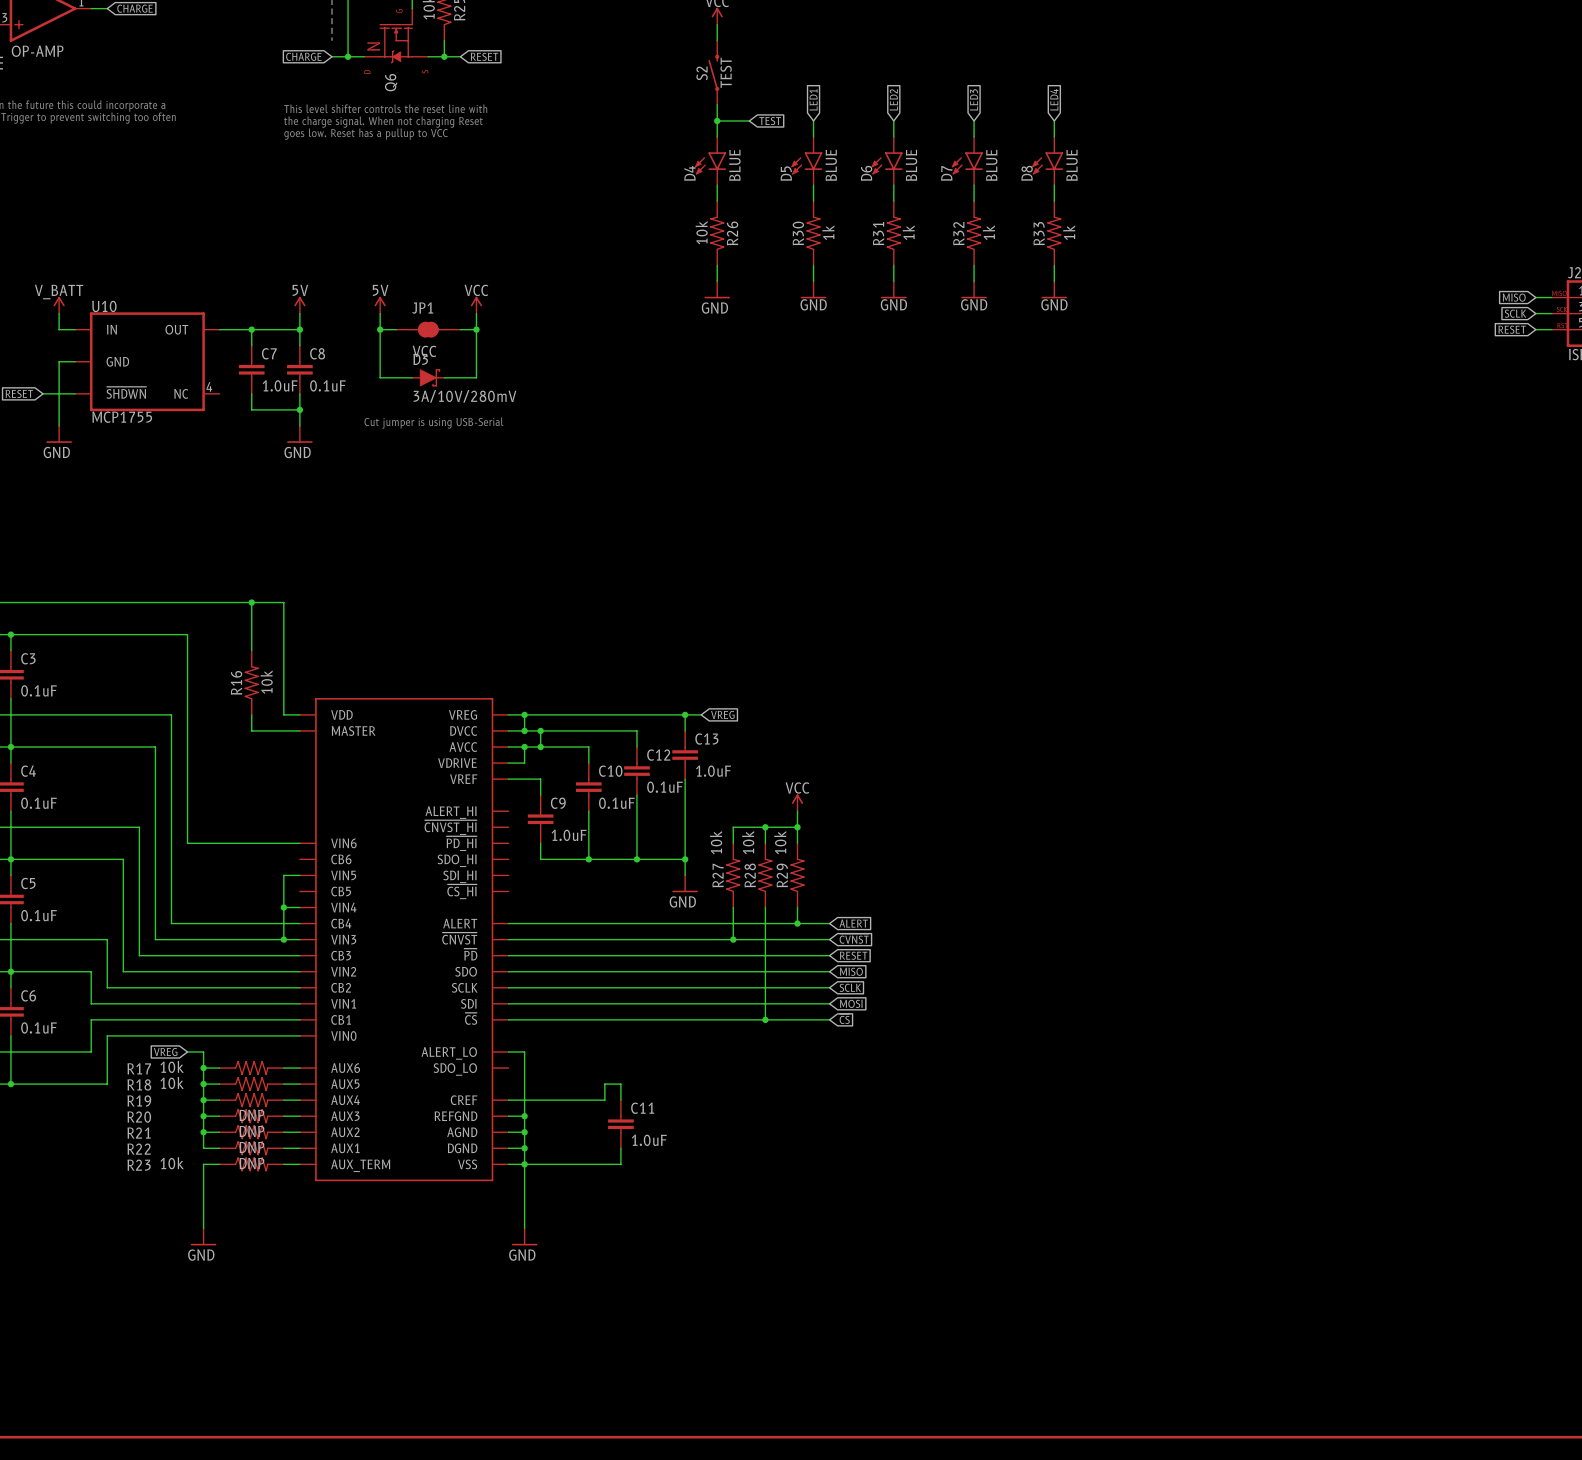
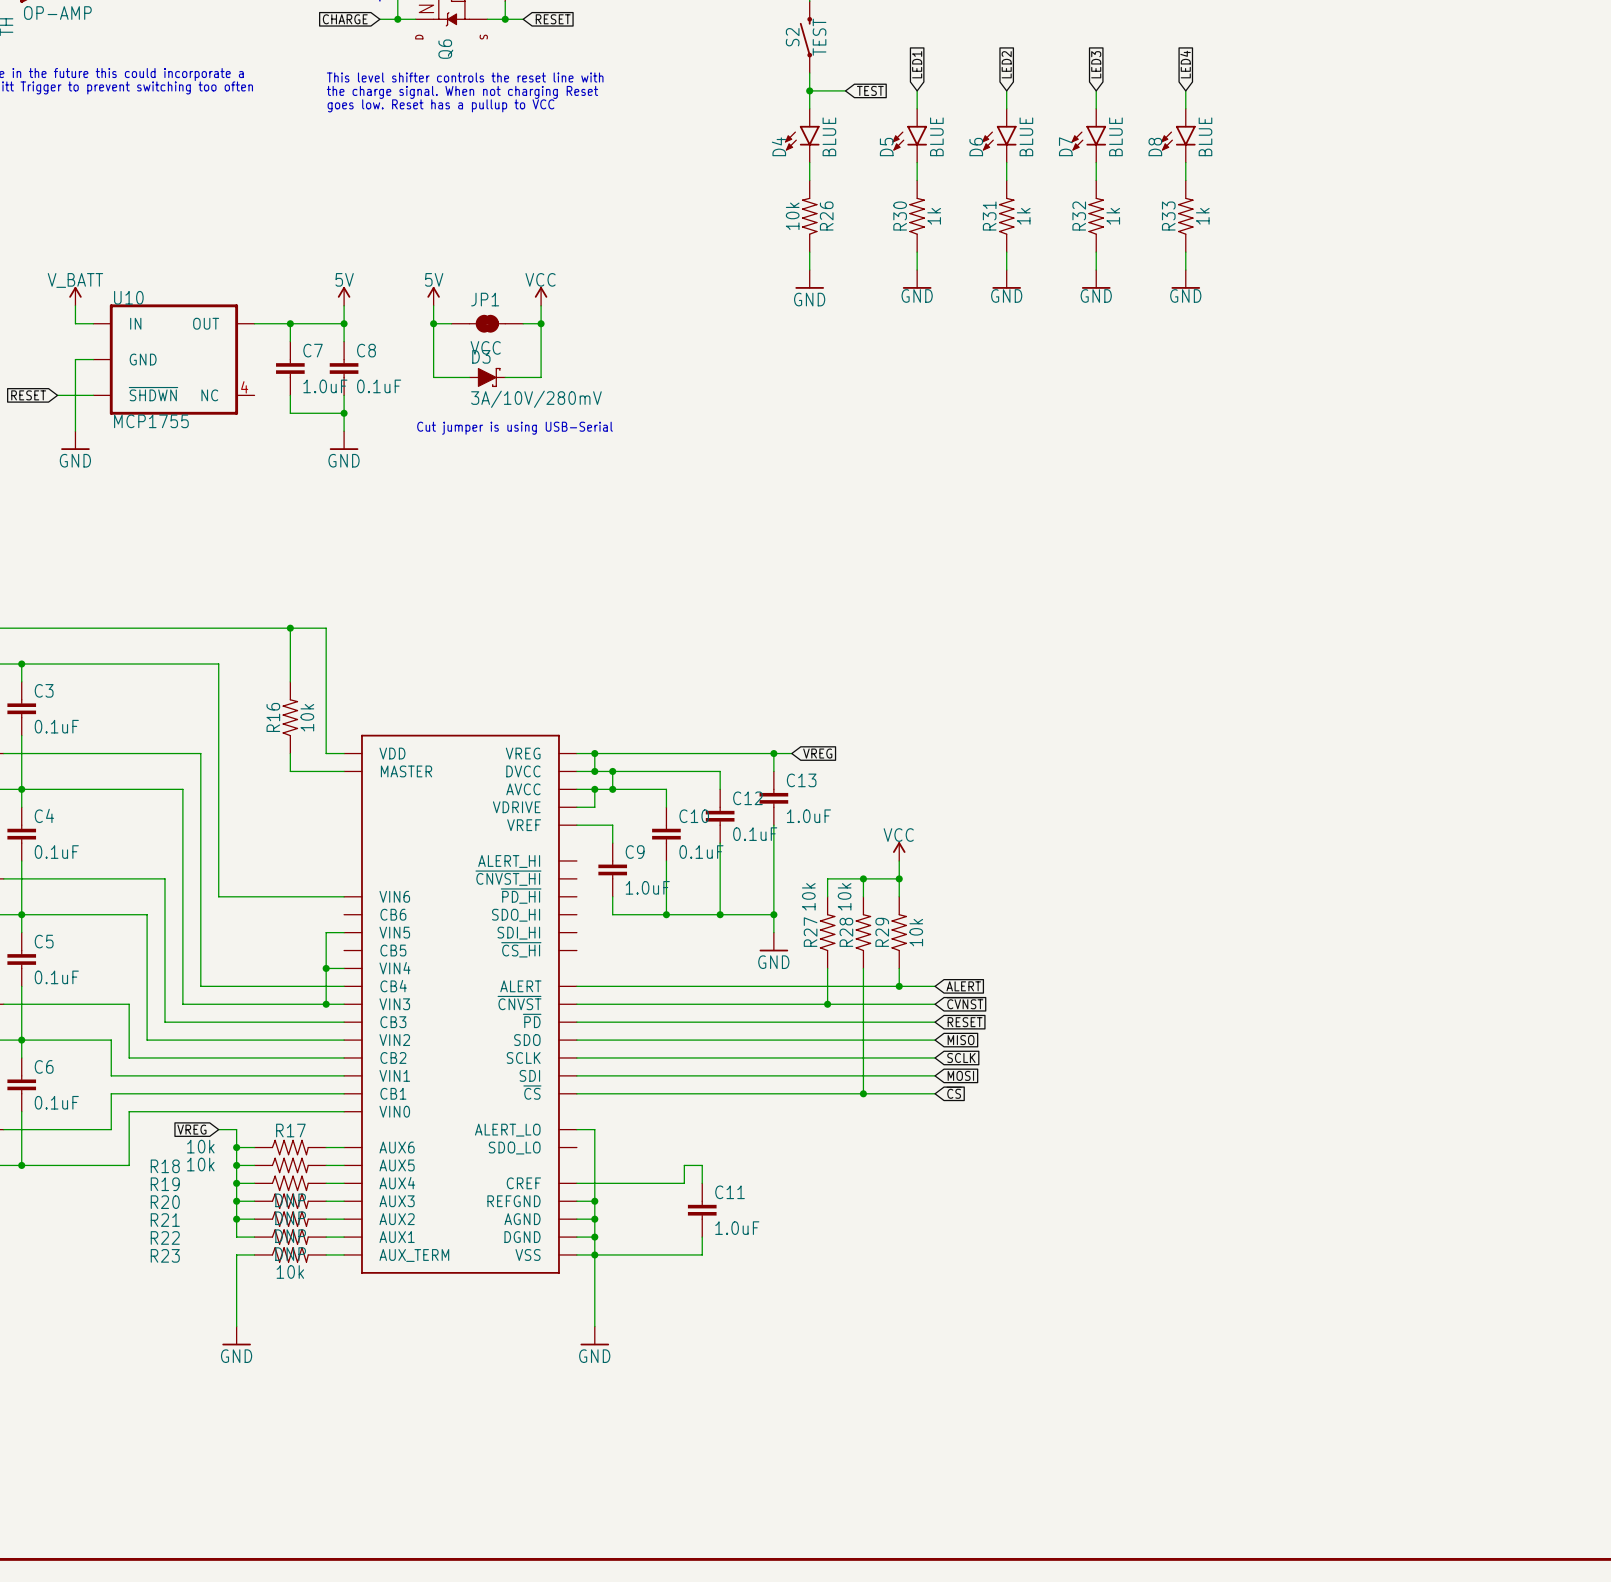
R29 value position: 10k (780, 842) -> 10k (916, 932)
R17 name position: R17 (139, 1068) -> R17 (290, 1130)
R23 value position: 10k (172, 1163) -> 10k (290, 1271)

